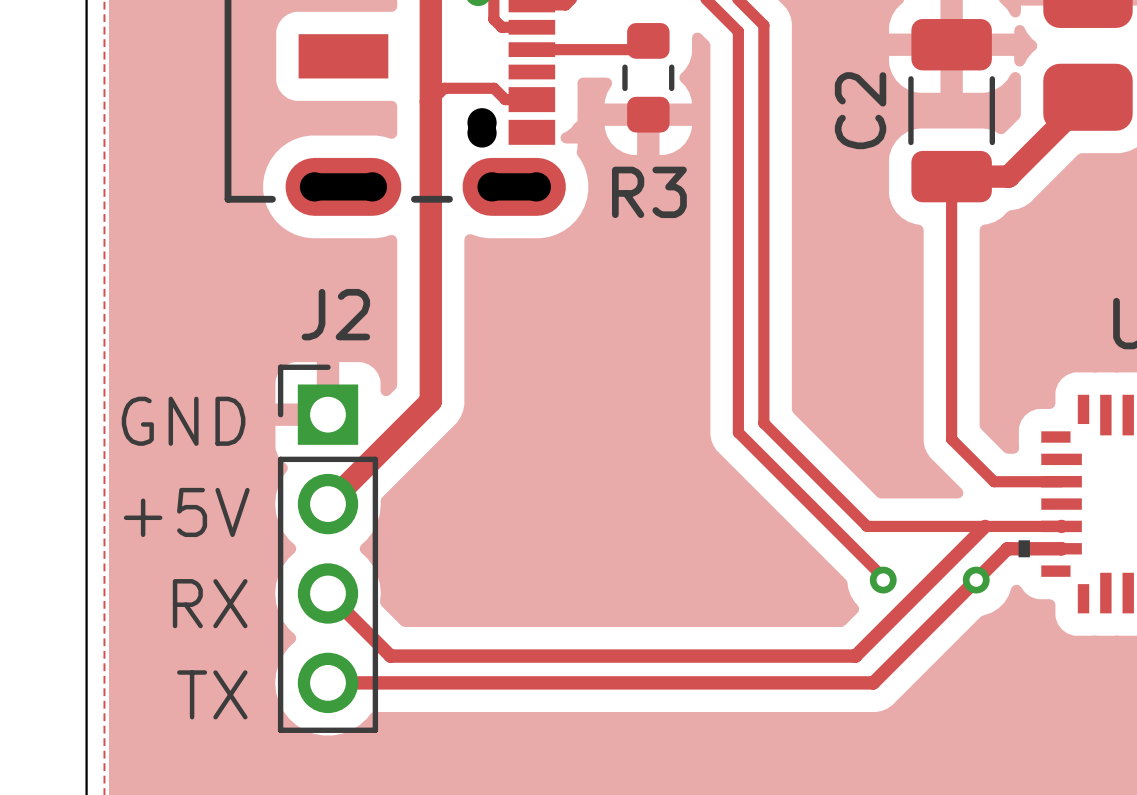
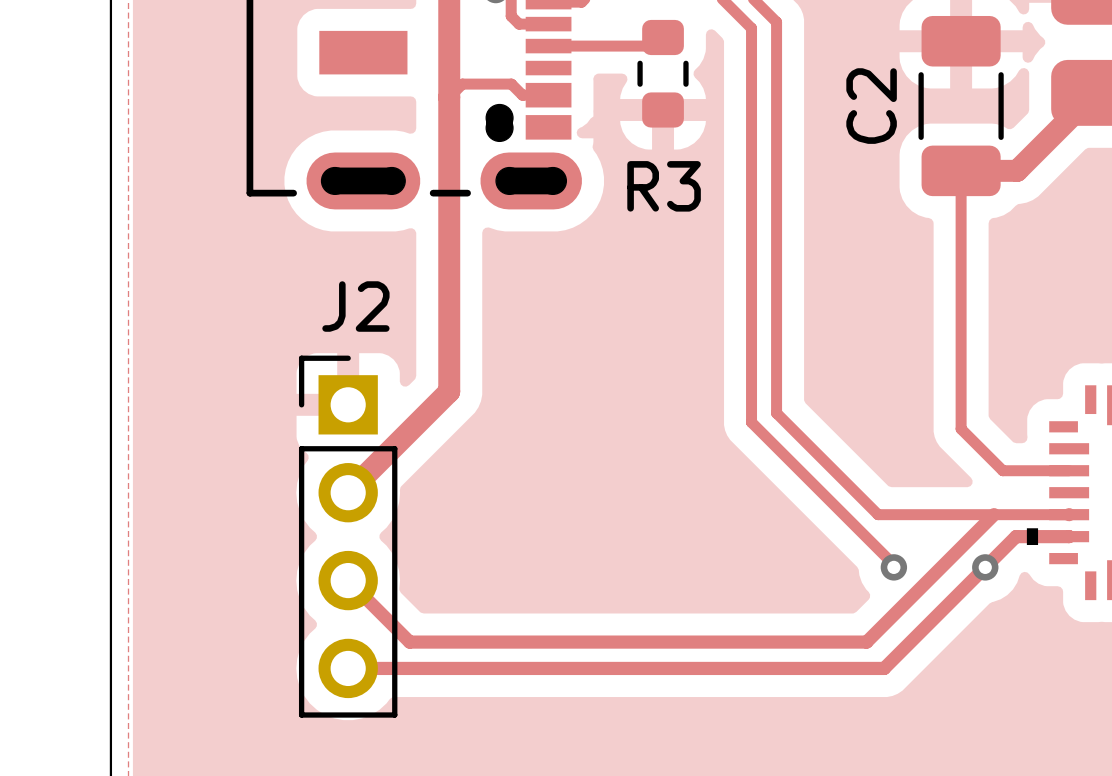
text: GND (183, 421) -> none
text: +5V (186, 512) -> none
text: RX (210, 603) -> none
text: TX (212, 694) -> none

